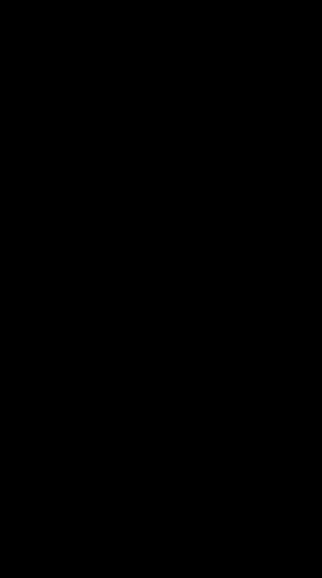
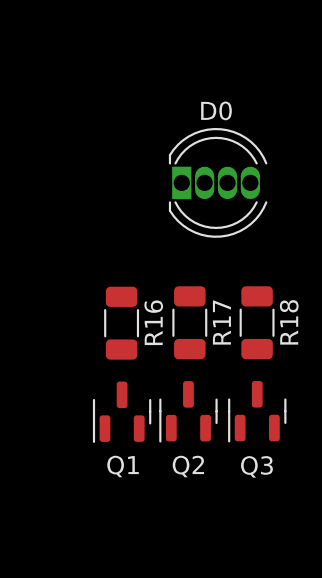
D0: none -> (218, 182)
R17: none -> (189, 322)
R18: none -> (257, 322)
R16: none -> (121, 323)
Q2: none -> (188, 411)
Q3: none -> (257, 411)
Q1: none -> (122, 412)

